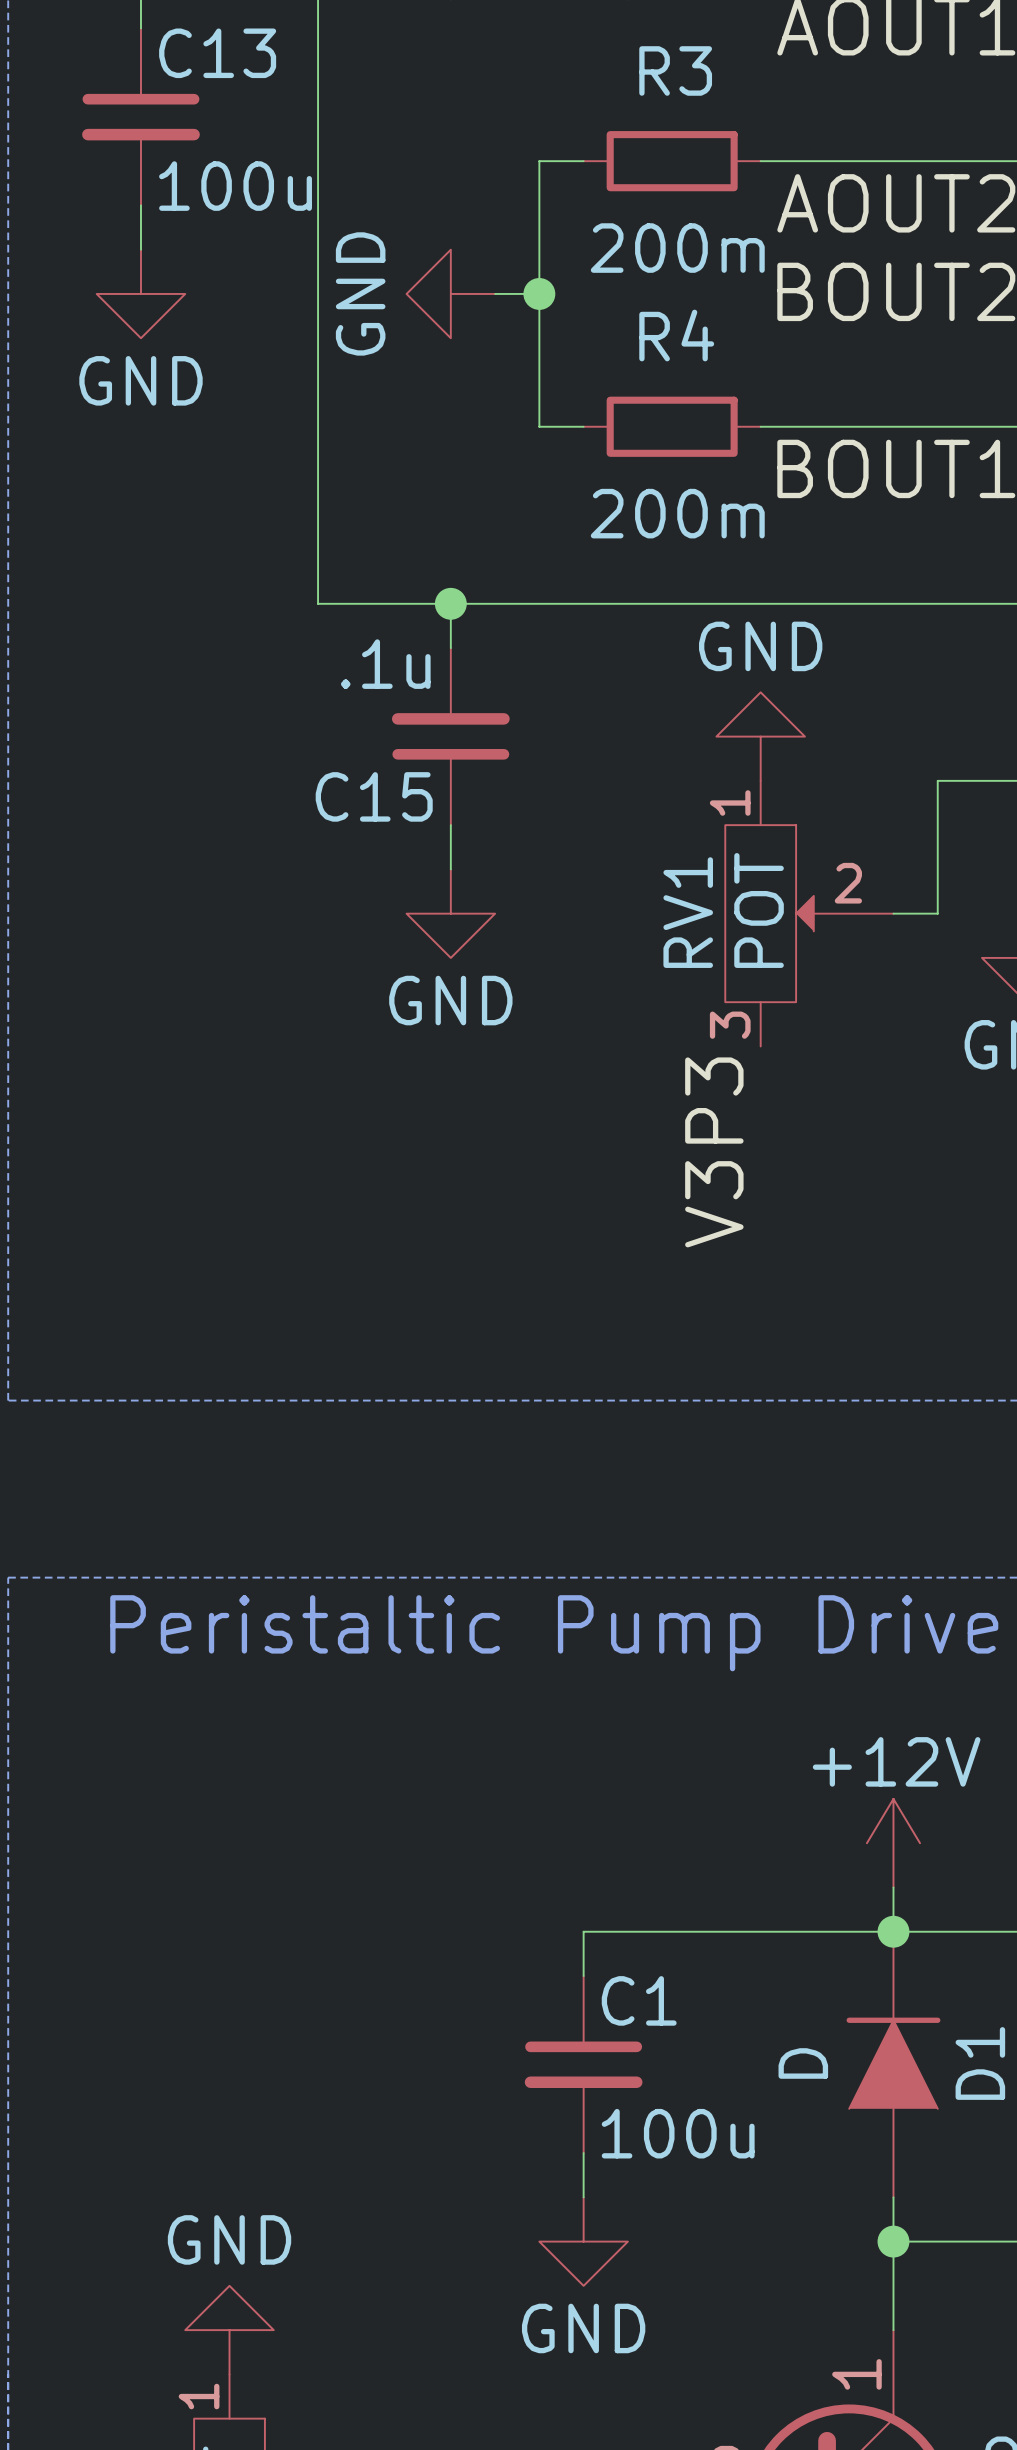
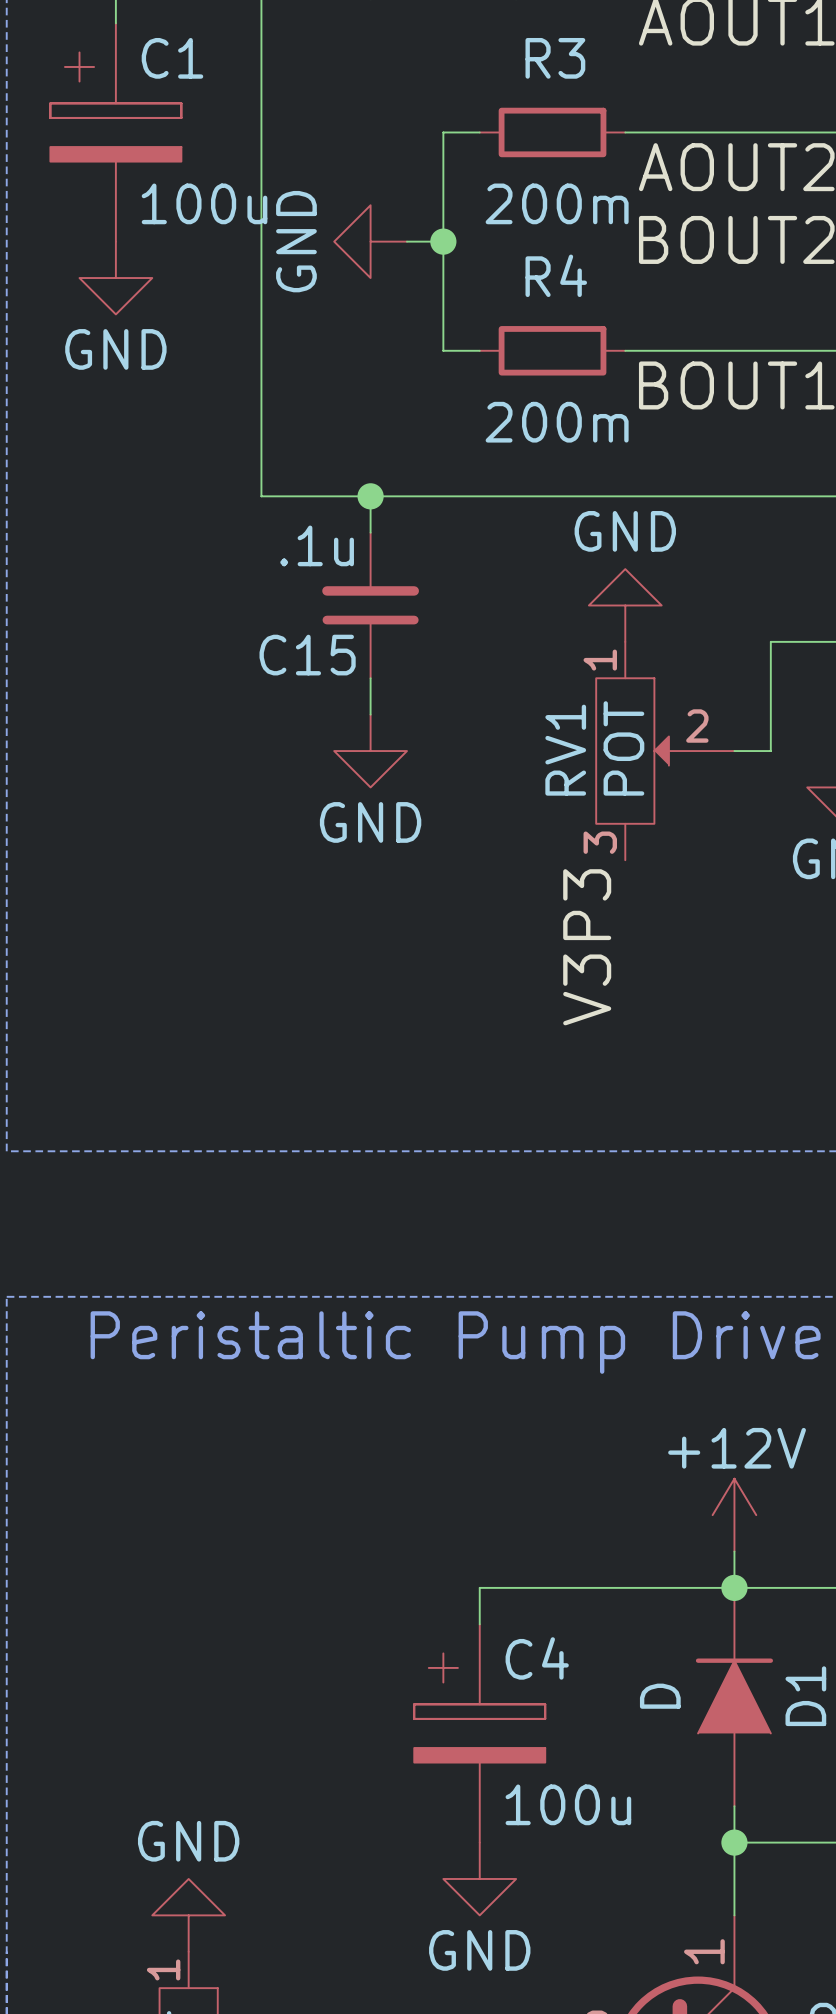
C13: 100u (140, 116) -> none
power symbol position: GND (140, 293) -> GND (115, 278)
C1 symbol: [524, 1976, 643, 2154] -> [50, 23, 182, 242]
C4: none -> 100u (479, 1733)
power symbol position: GND (583, 2241) -> GND (479, 1878)

